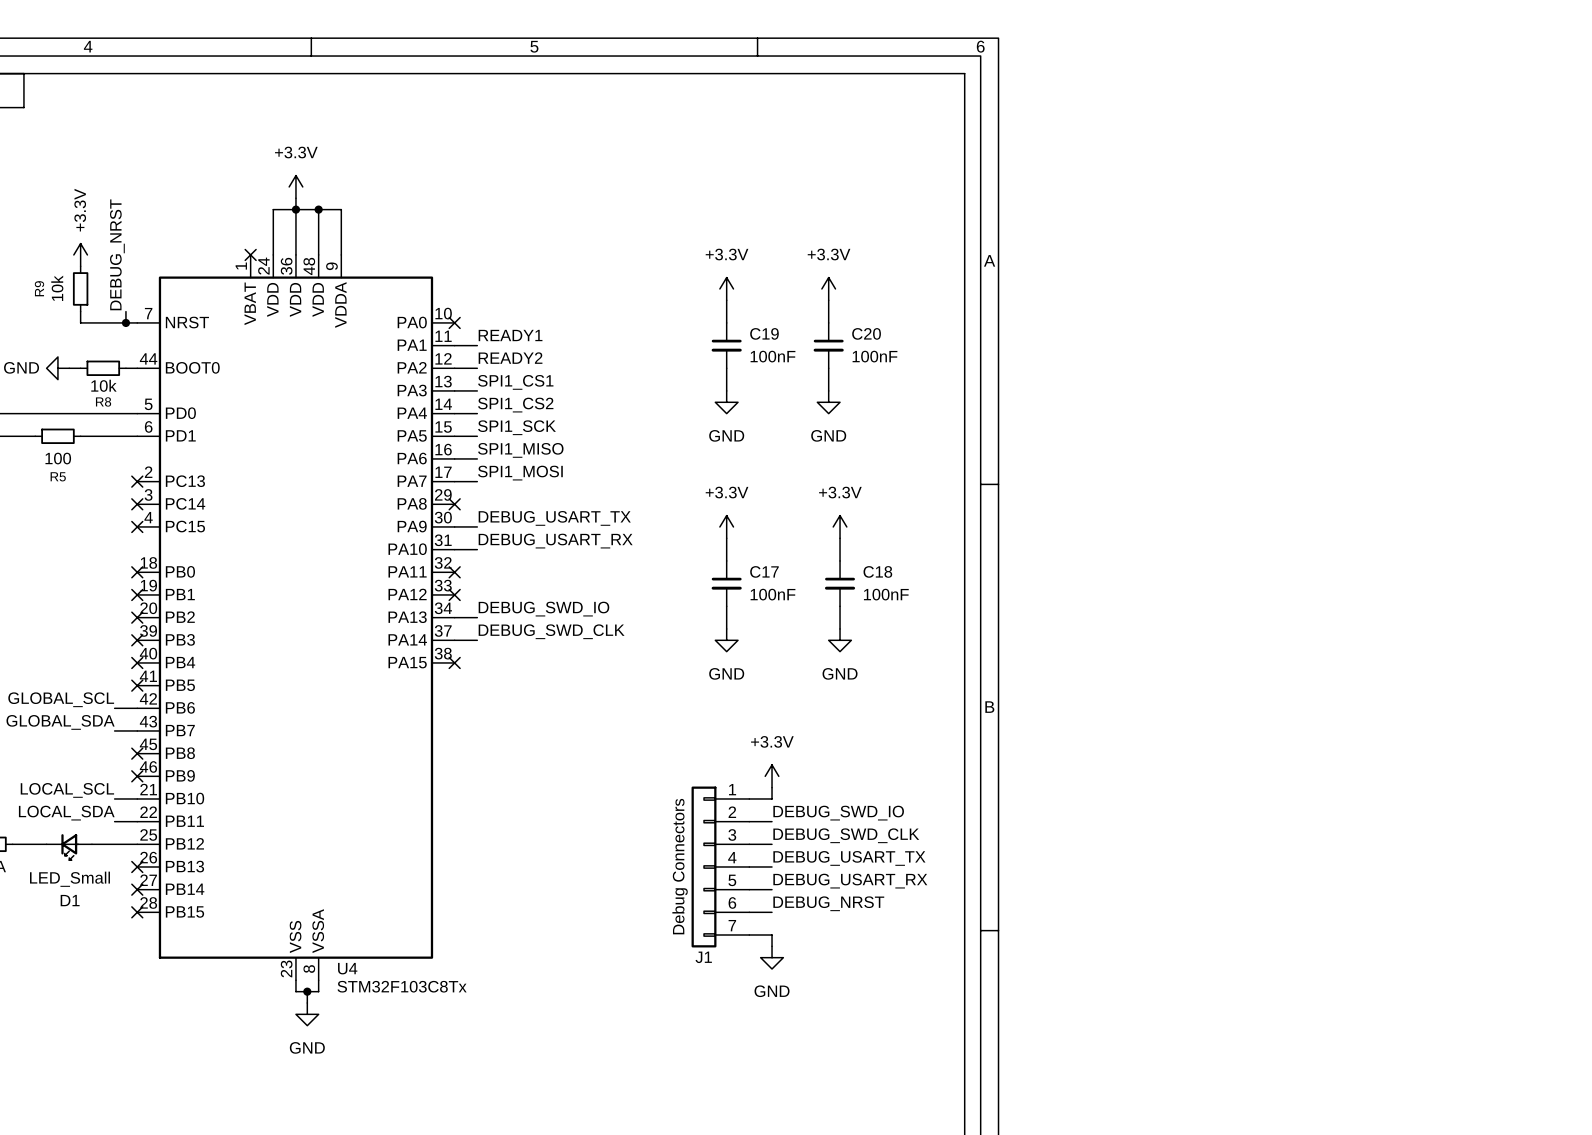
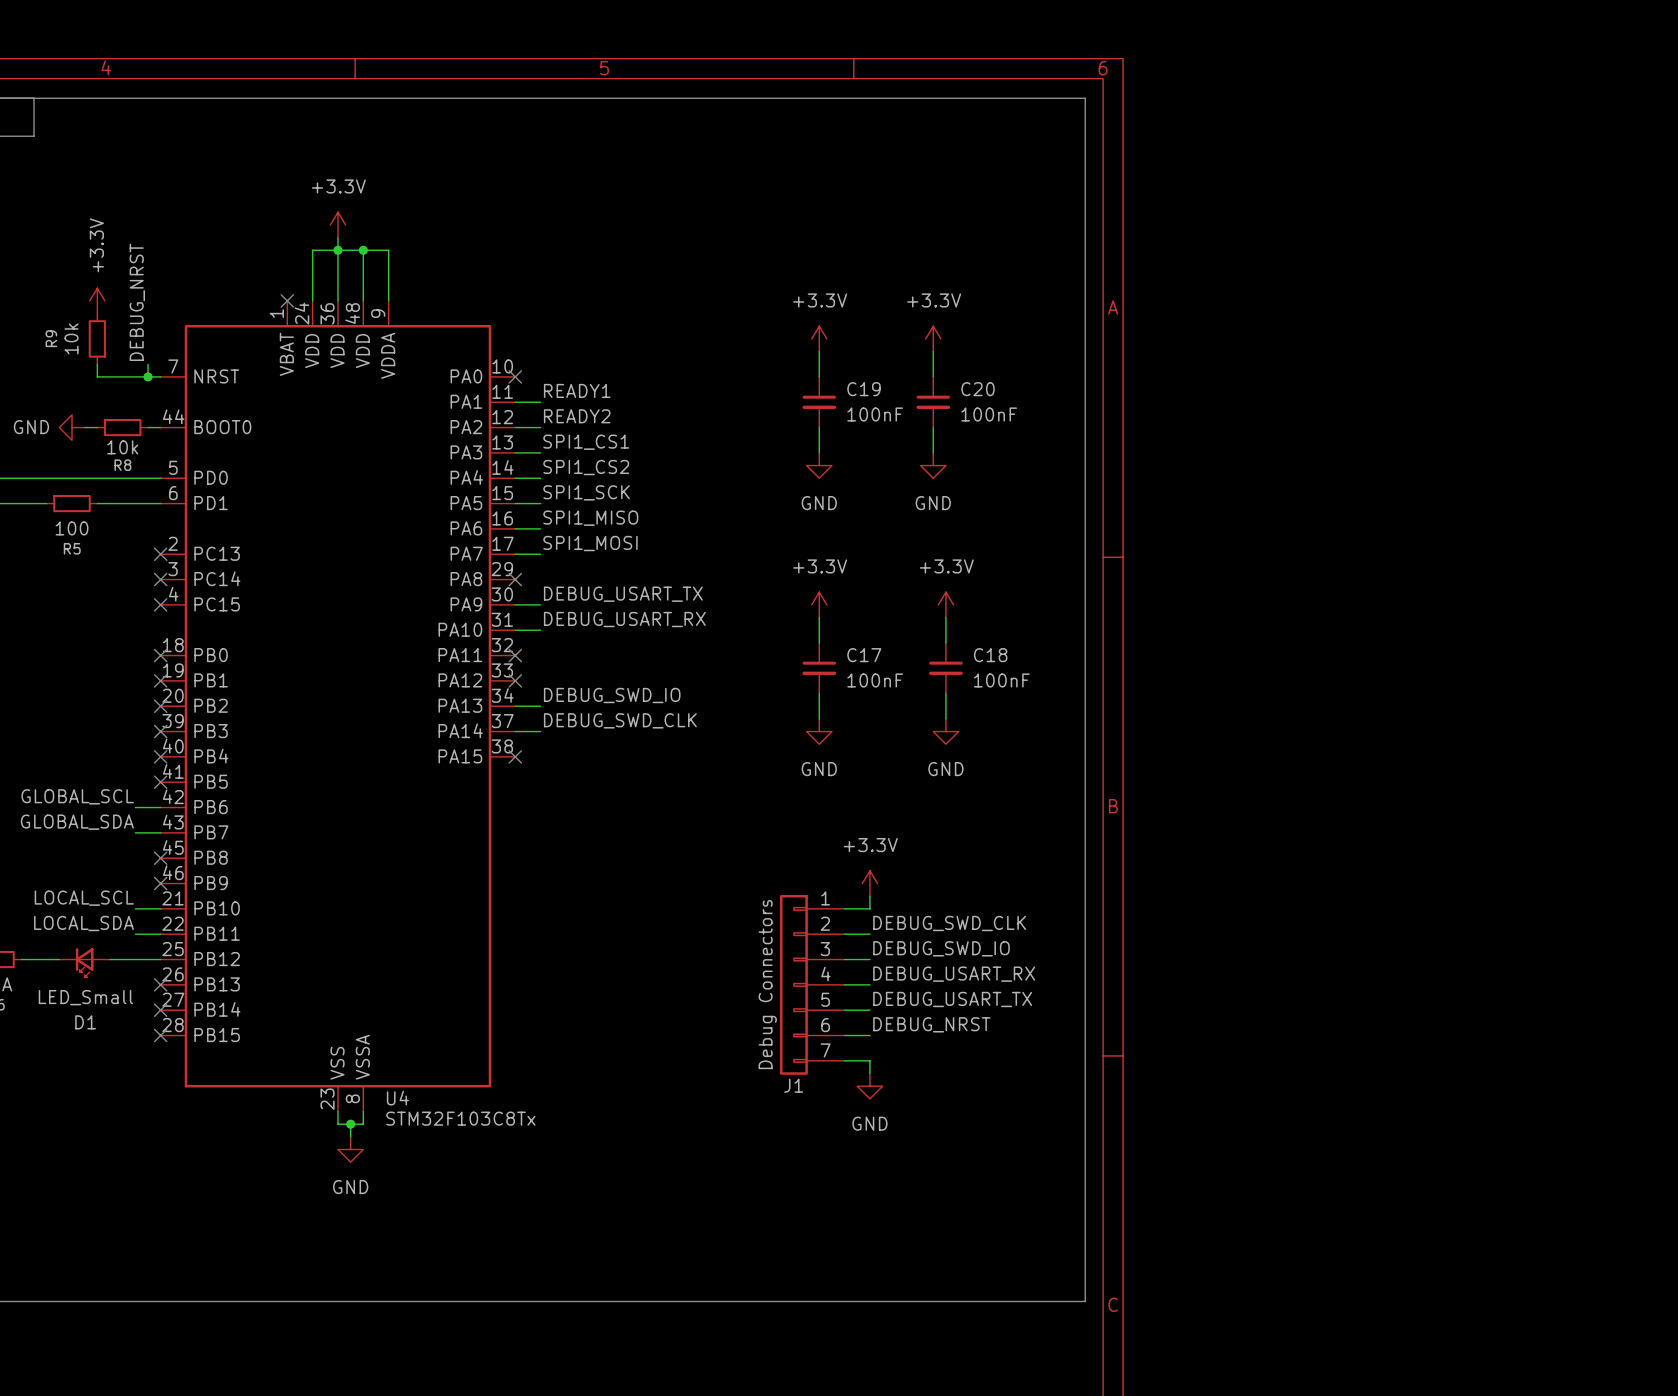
label: DEBUG_SWD_IO (838, 813) -> DEBUG_SWD_CLK (949, 923)
label: DEBUG_SWD_CLK (846, 835) -> DEBUG_SWD_IO (941, 948)
label: DEBUG_USART_TX (849, 858) -> DEBUG_USART_RX (954, 974)
label: DEBUG_USART_RX (850, 881) -> DEBUG_USART_TX (952, 999)

